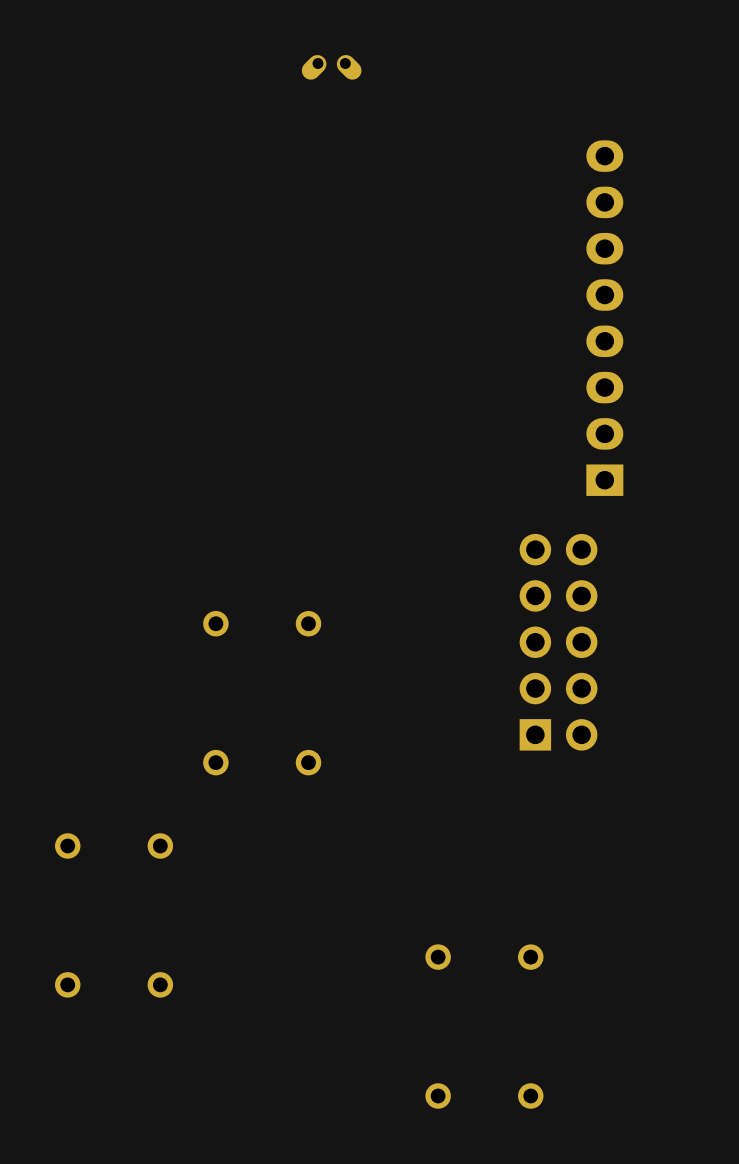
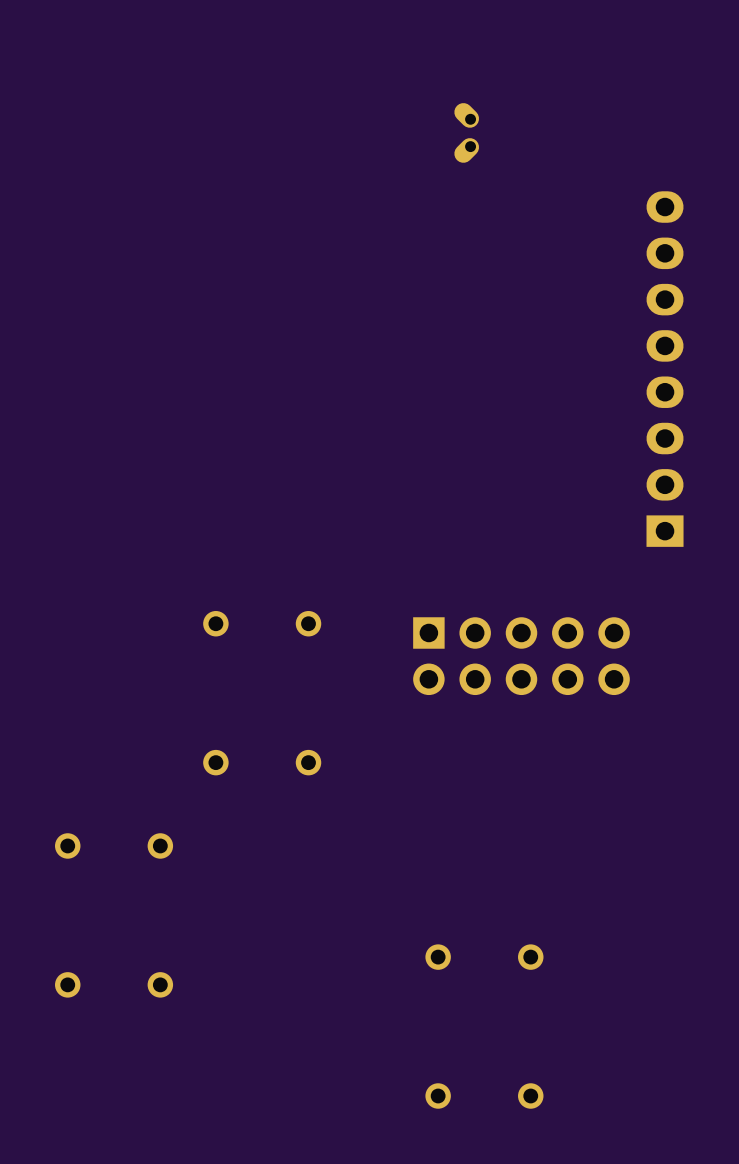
part rotation: 0° (331, 67) -> 90° clockwise (466, 132)
part position: (331, 67) -> (466, 132)
part position: (604, 318) -> (665, 369)
part rotation: 0° (558, 642) -> 90° clockwise (521, 656)

